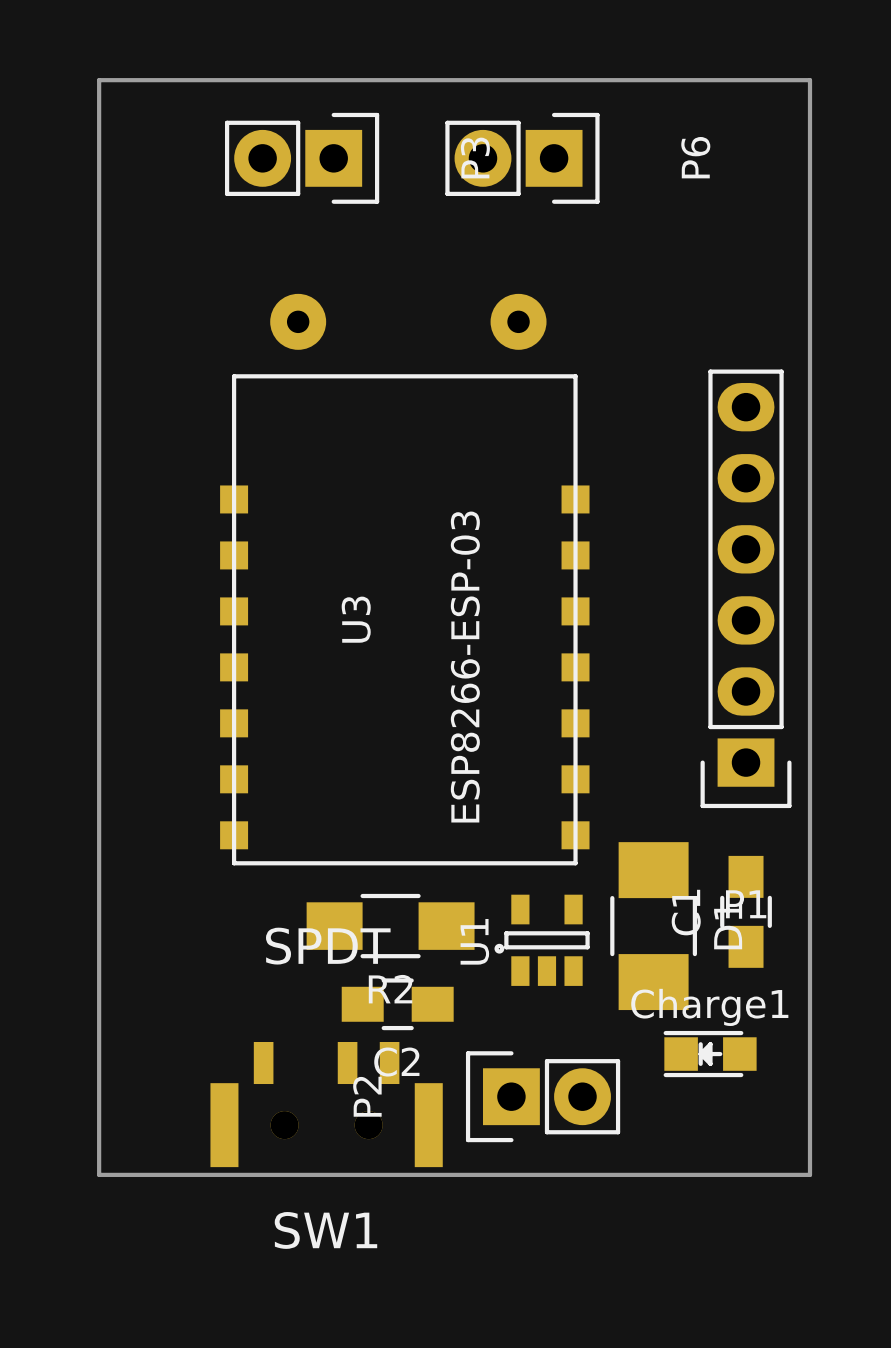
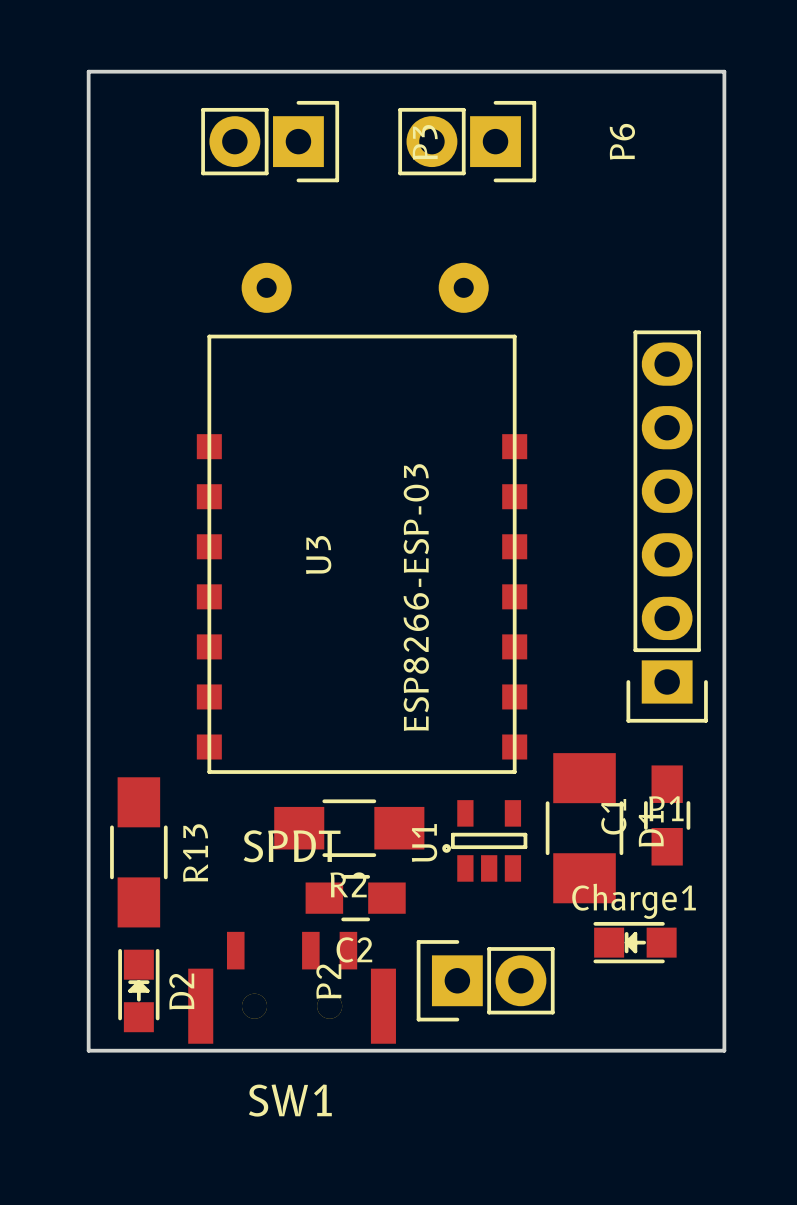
R13: none -> (138, 852)
D2: none -> (138, 990)

